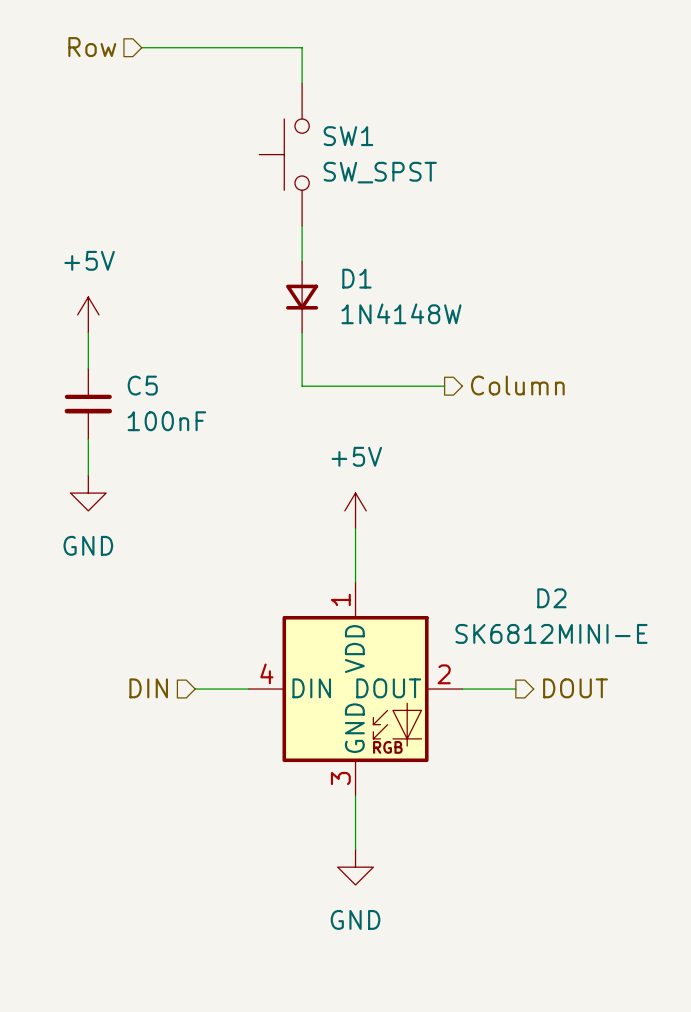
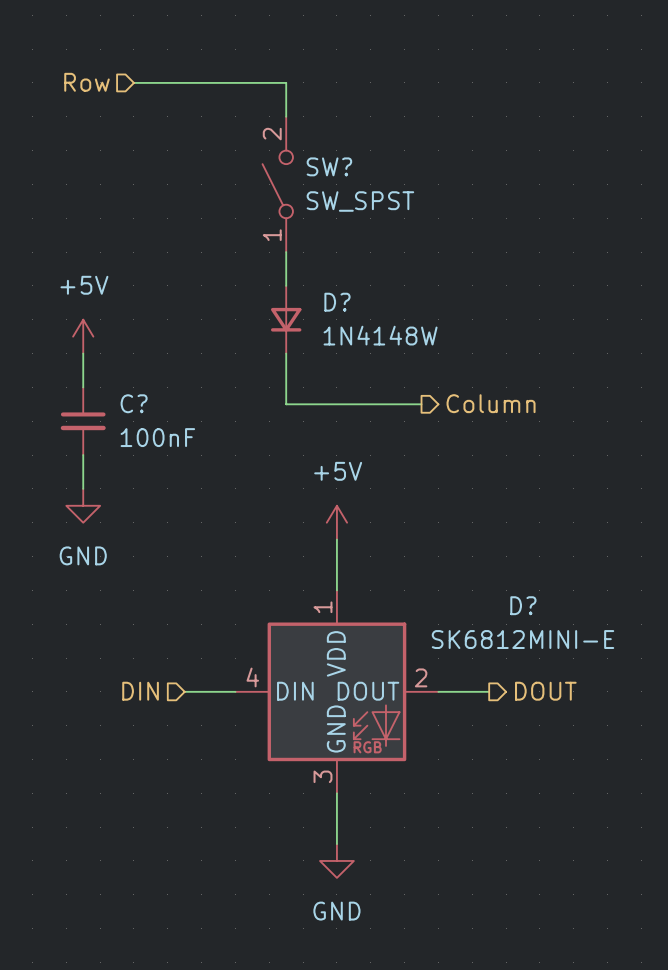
SW1: SW_SPST (284, 154) -> none
SW?: none -> SW_SPST (277, 184)
D1 name: D1 (356, 278) -> D? (337, 302)
C5 name: C5 (142, 385) -> C? (134, 403)
D2 name: D2 (551, 598) -> D? (523, 605)

